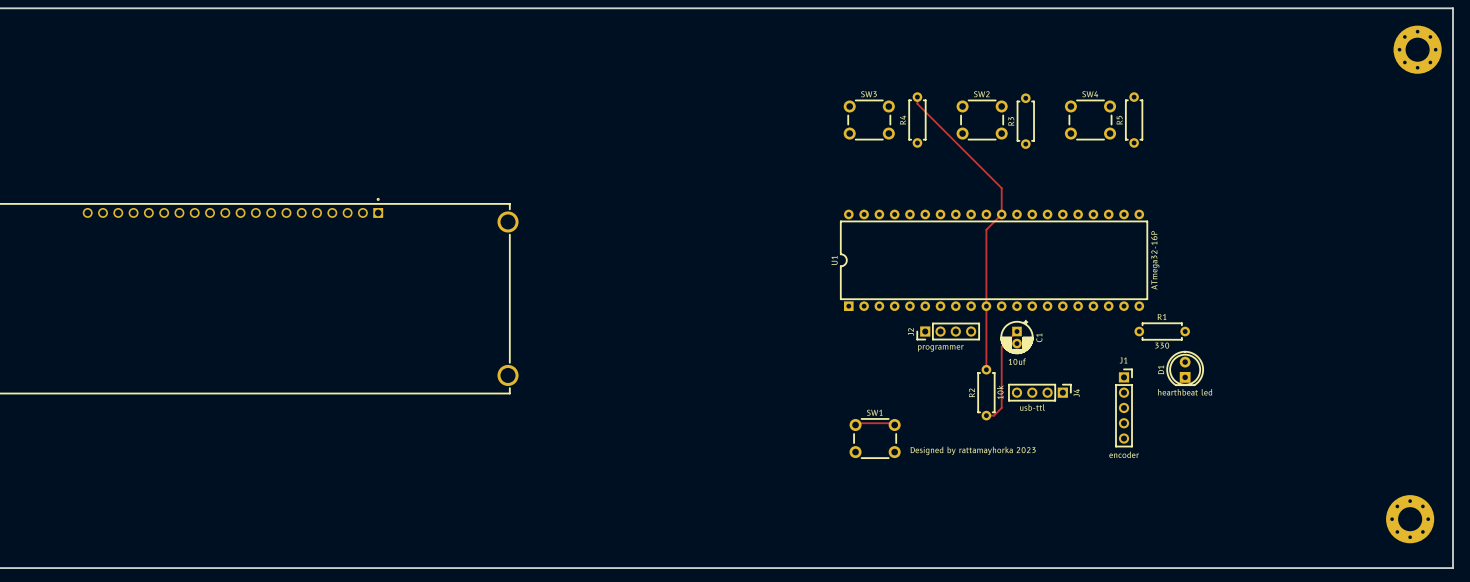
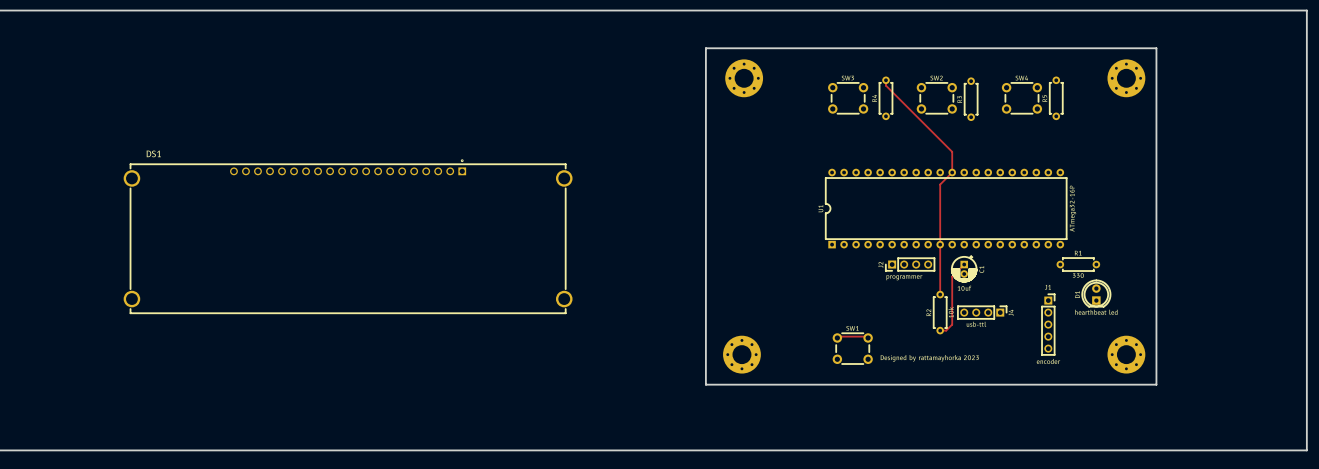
part: (1417, 49) -> none
board edge: none -> (705, 48) (1156, 48) (1156, 384) (705, 384) (705, 48)
part: none -> (744, 78)
part: none -> (1126, 78)
part: none -> (741, 354)
part: none -> (1126, 354)
part: (1410, 519) -> none

